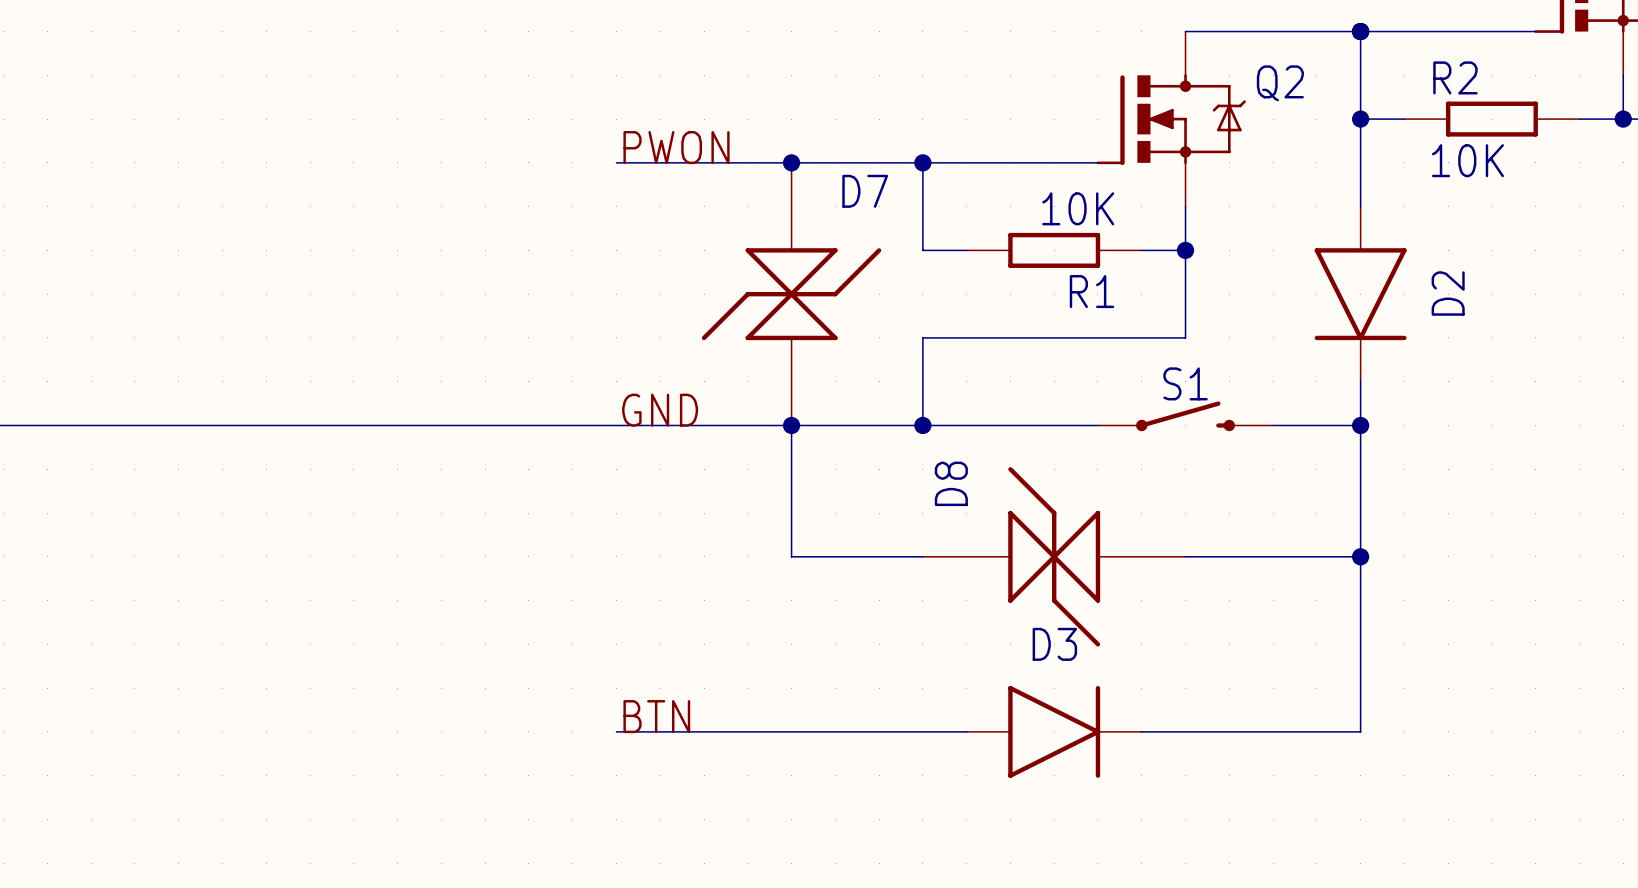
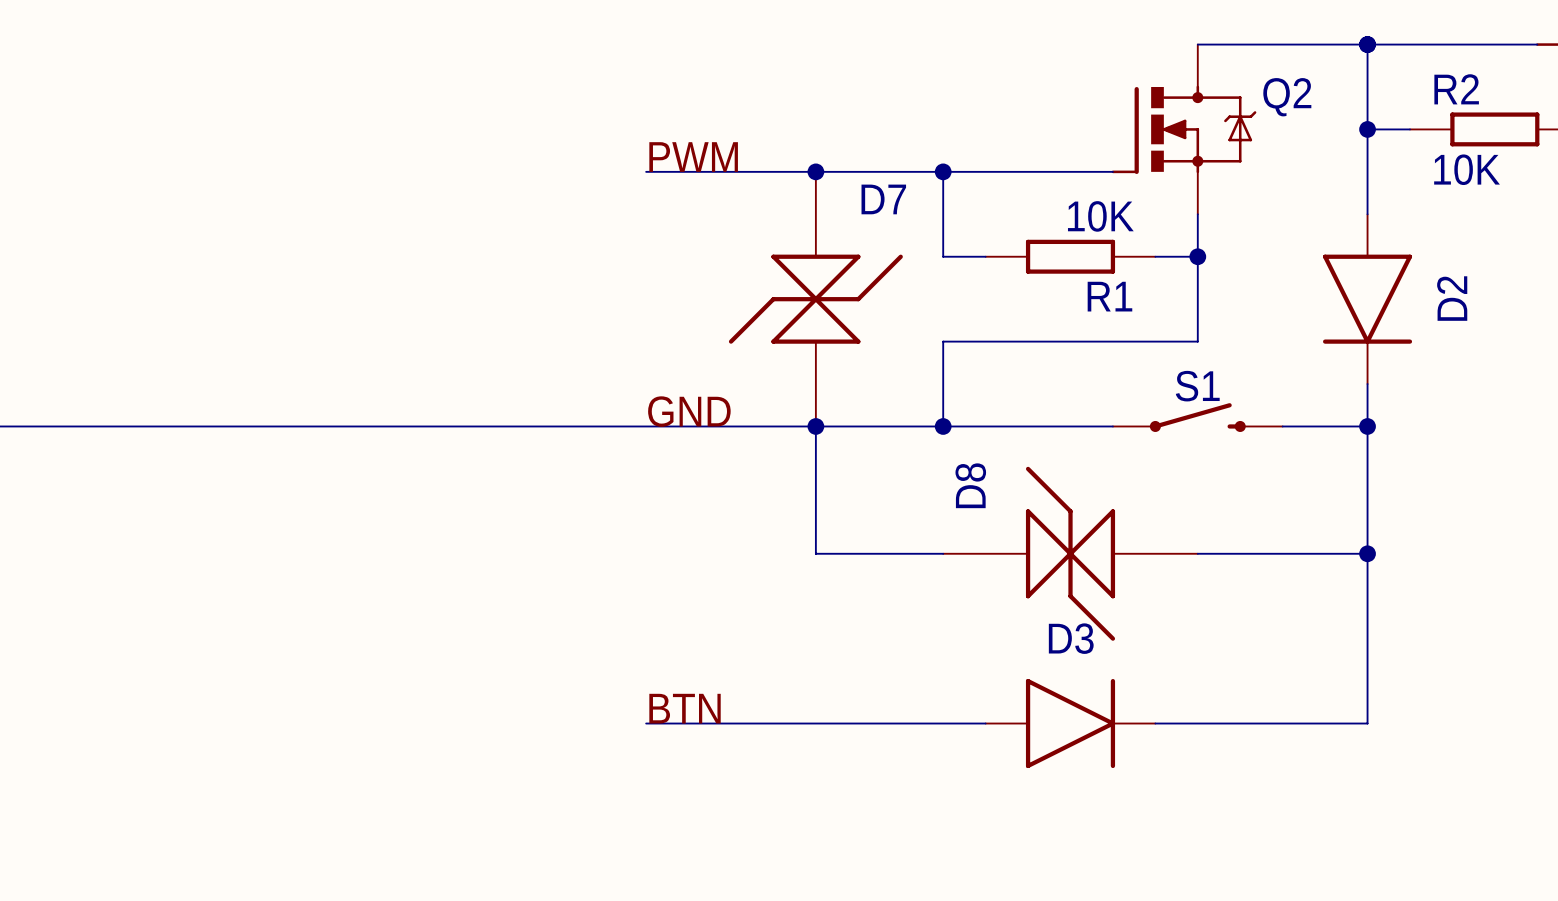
label: PWON (676, 147) -> PWM (693, 157)

